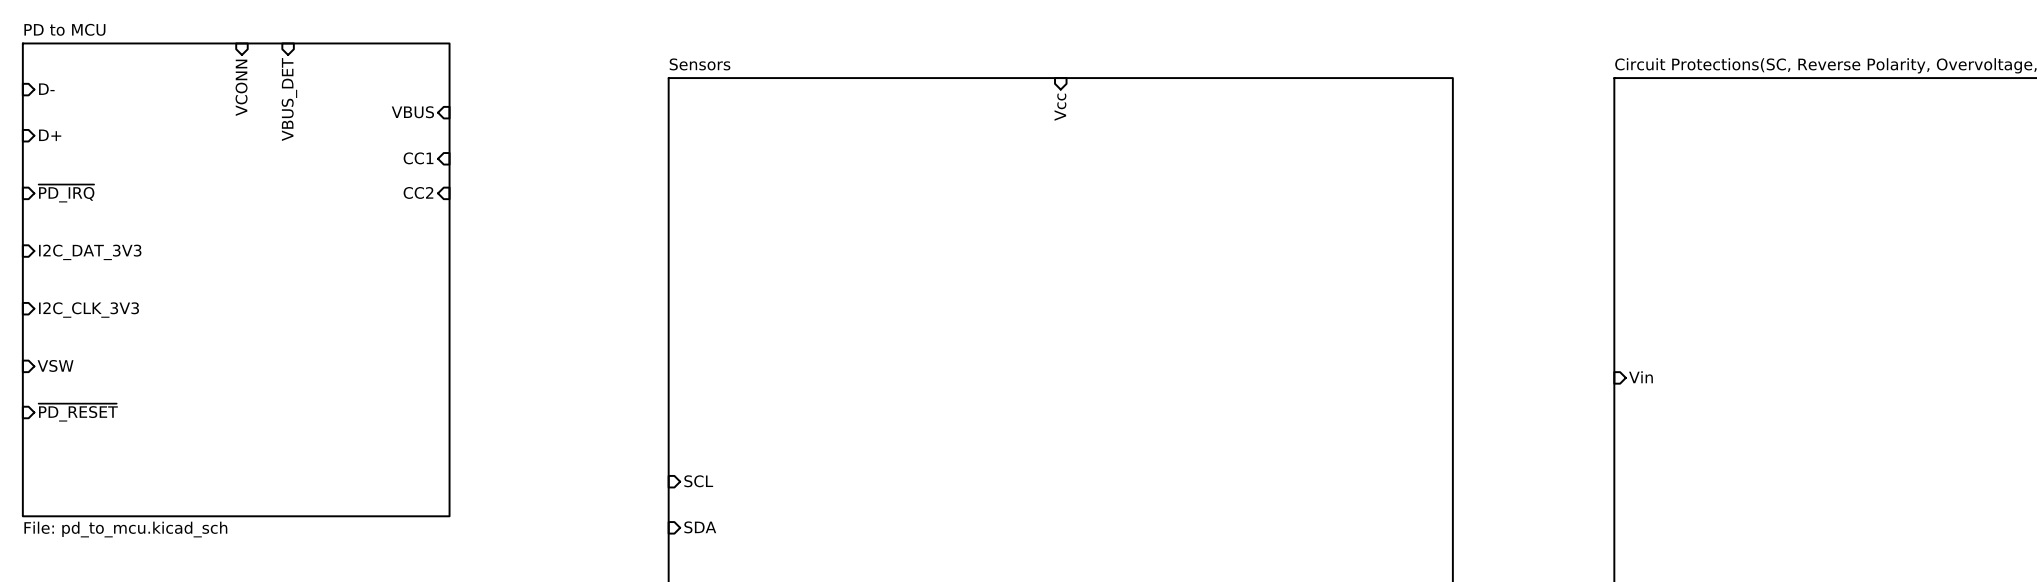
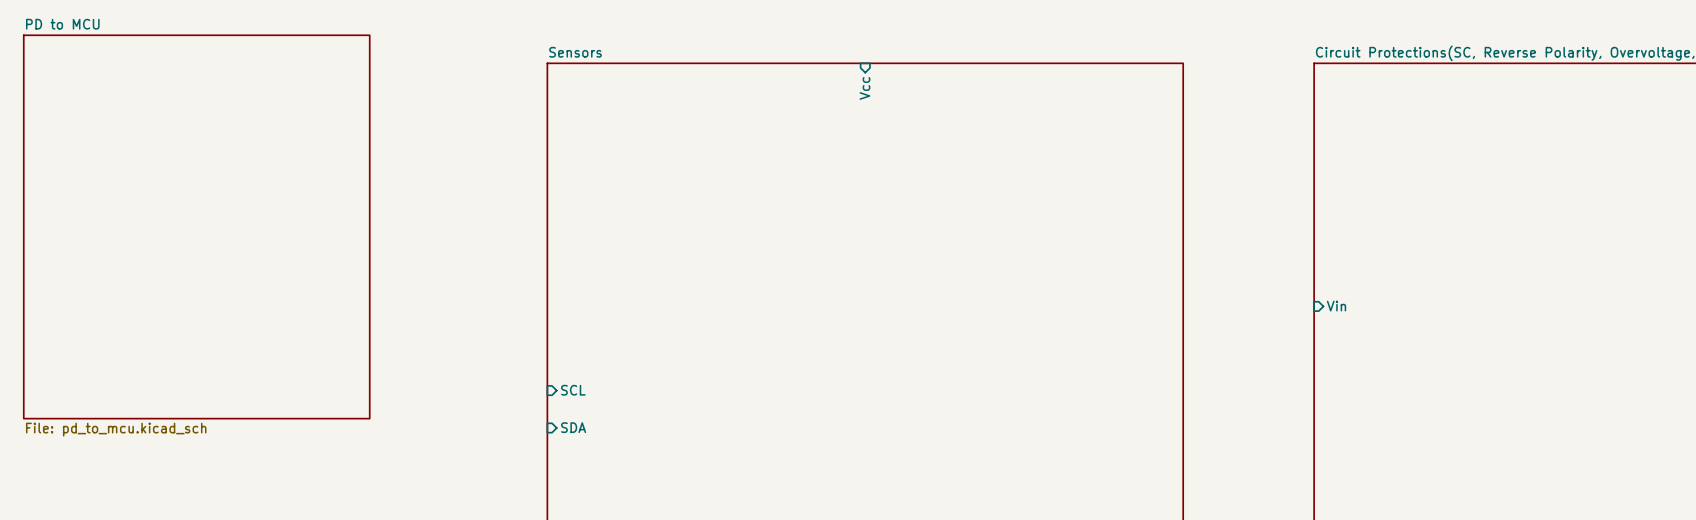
sheet pin: VCONN (241, 87) -> none
sheet pin: D- (46, 89) -> none
sheet pin: VBUS_DET (289, 99) -> none
sheet pin: VBUS (412, 112) -> none
sheet pin: D+ (50, 135) -> none
sheet pin: CC1 (418, 158) -> none
sheet pin: CC2 (418, 192) -> none
sheet pin: ~{PD_IRQ} (66, 193) -> none
sheet pin: I2C_DAT_3V3 (90, 252) -> none
sheet pin: I2C_CLK_3V3 (89, 310) -> none
sheet pin: VSW (55, 365) -> none
sheet pin: ~{PD_RESET} (78, 412) -> none

